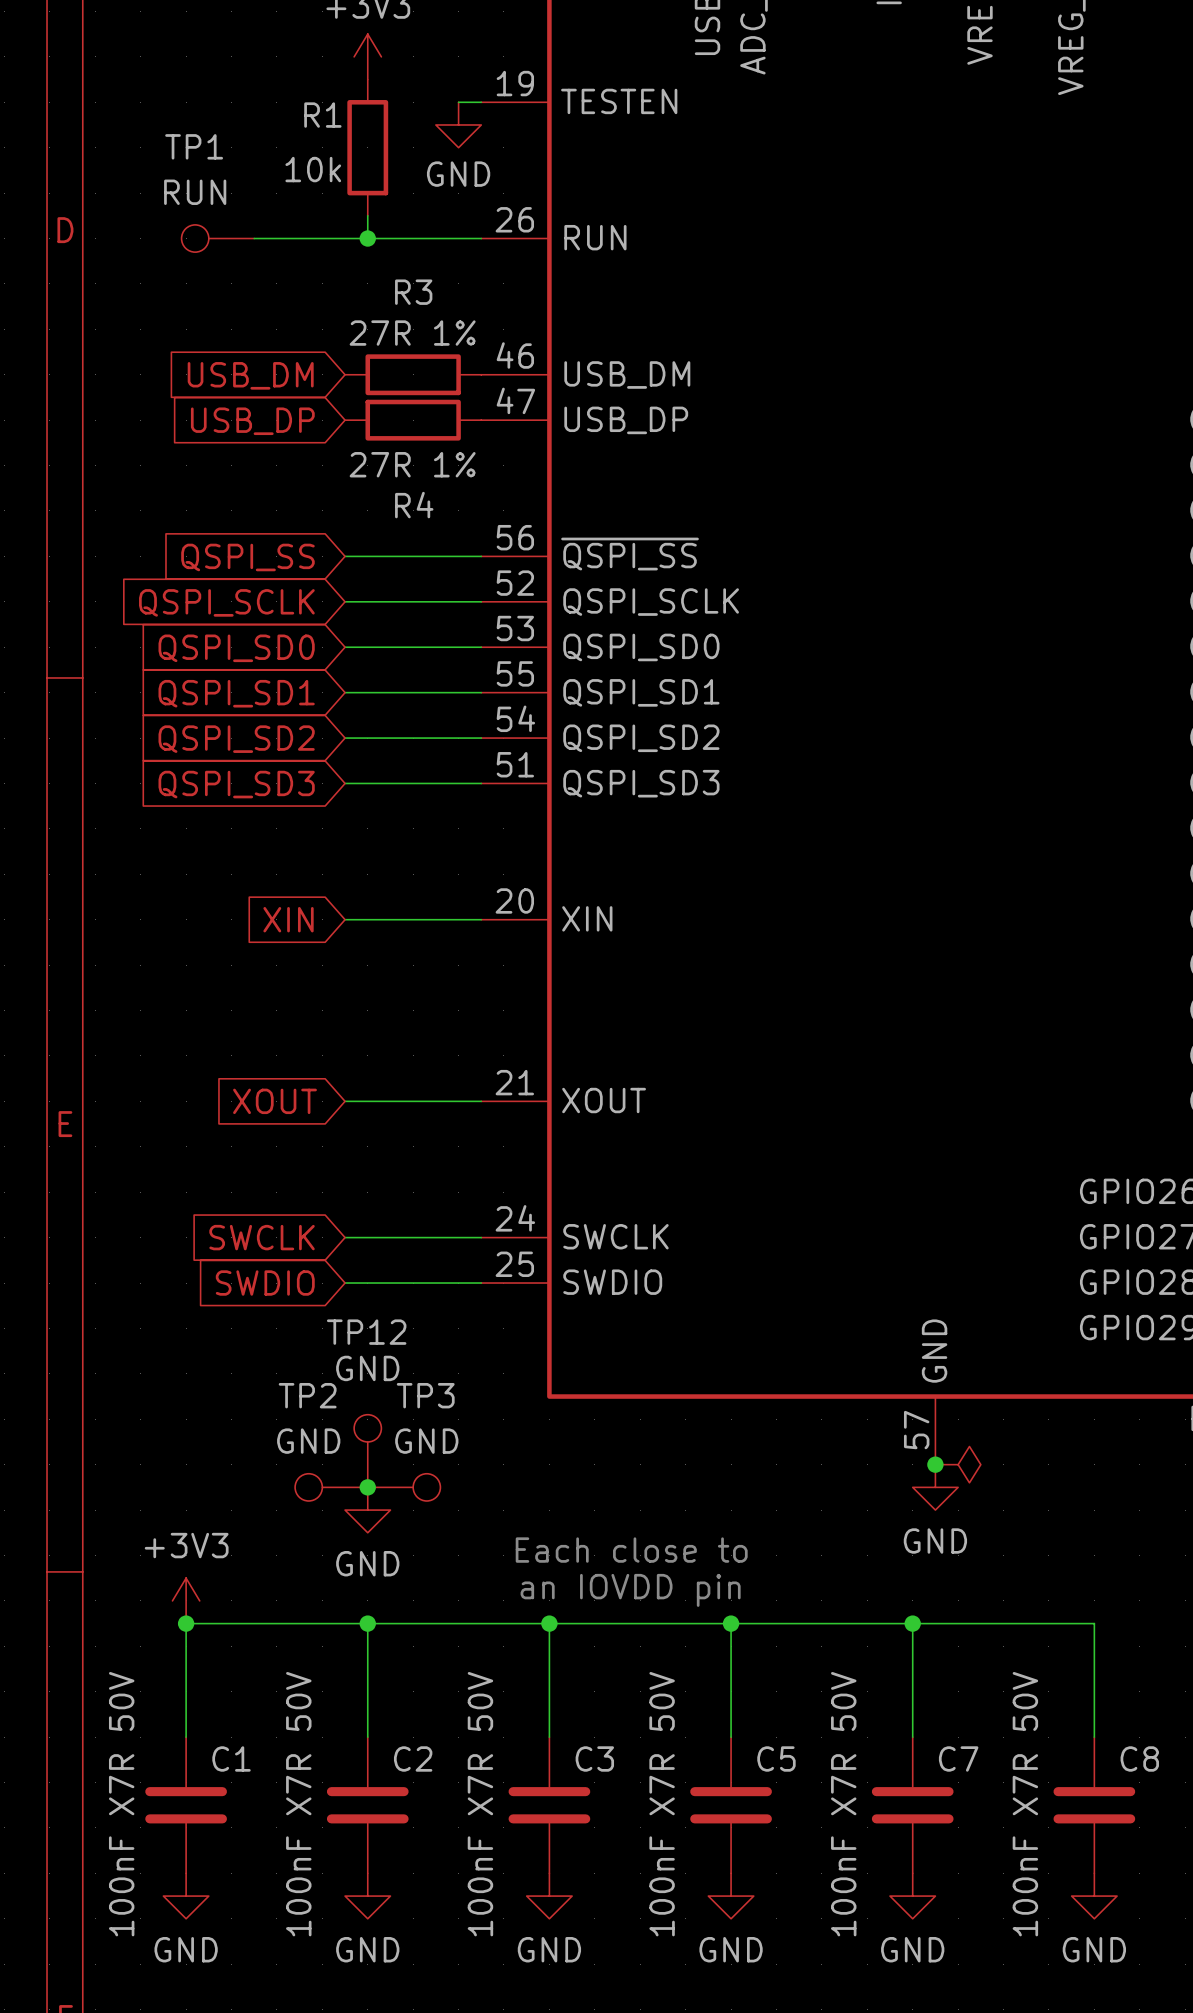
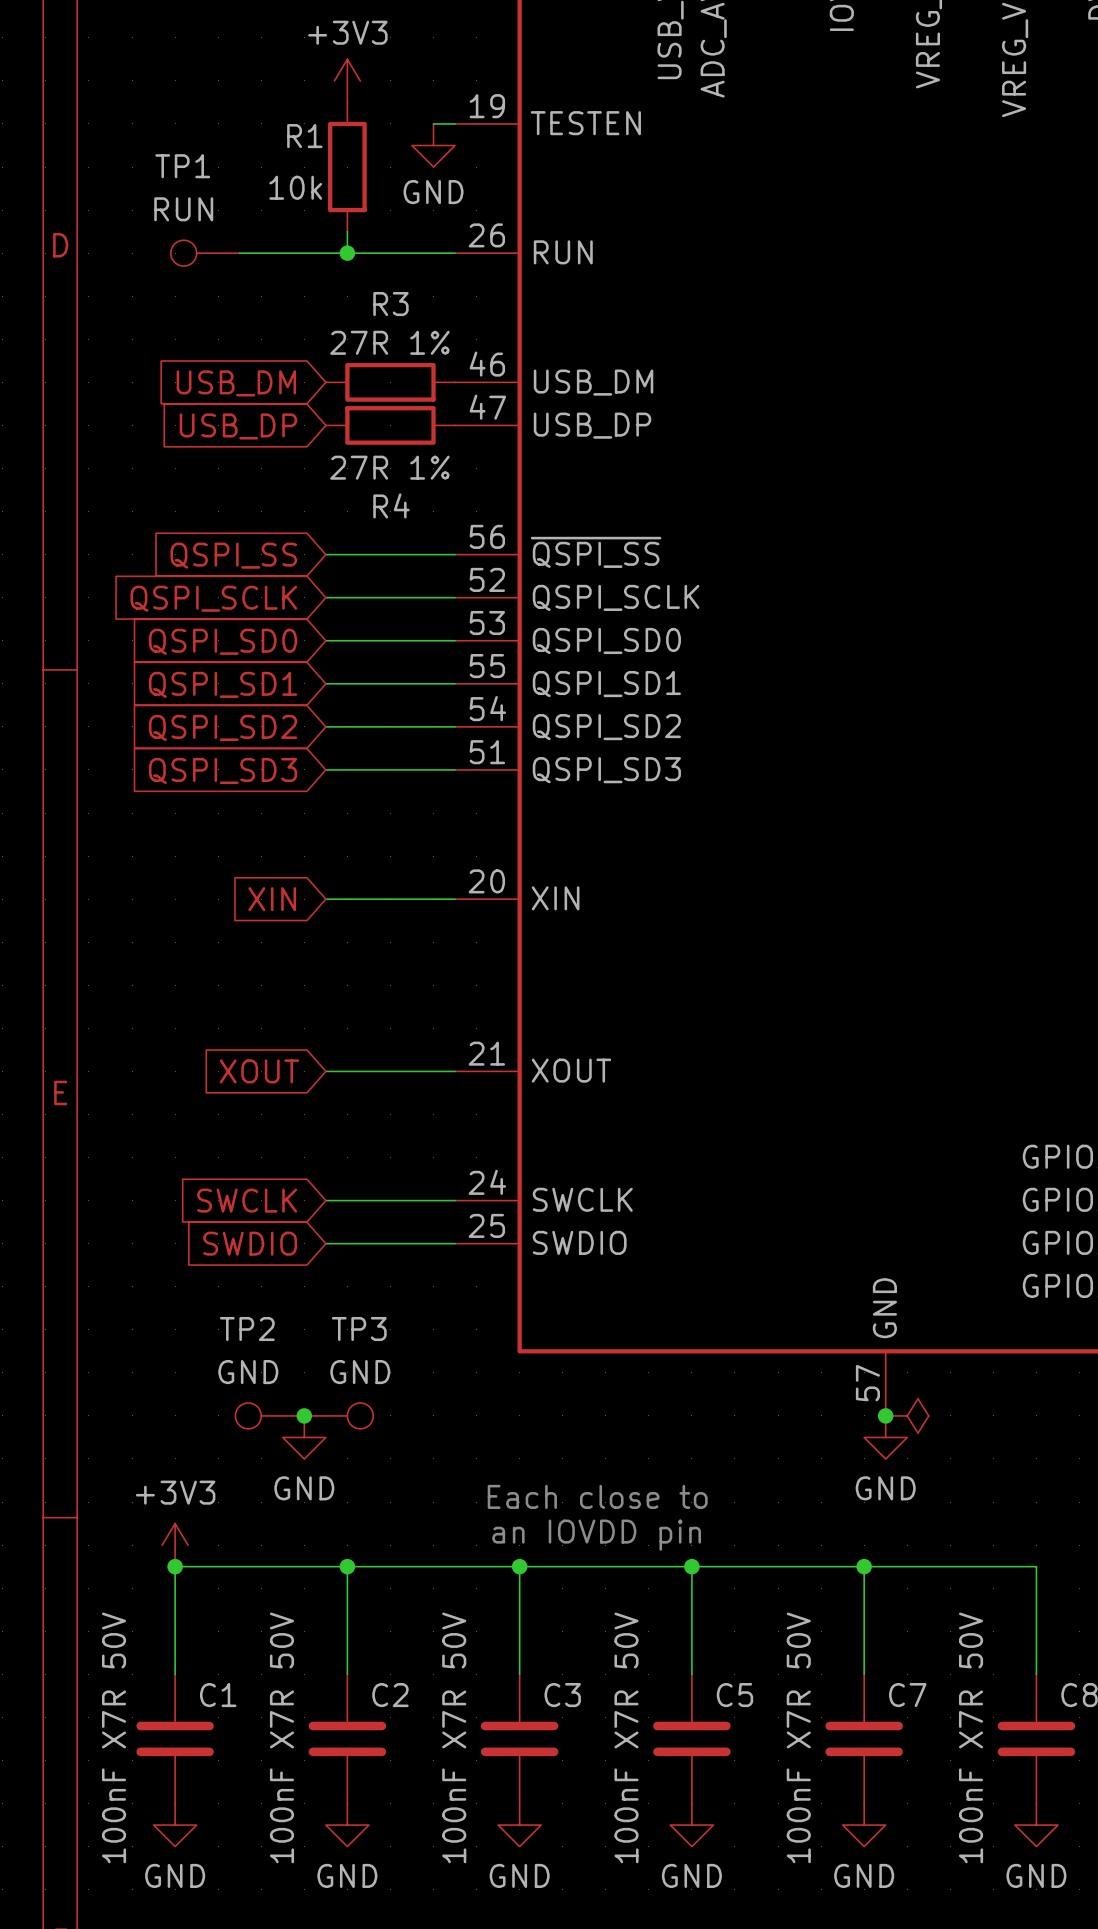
TP12: GND (367, 1451) -> none
TP2 position: (331, 1487) -> (269, 1415)
junction position: (367, 1487) -> (304, 1415)
TP3 position: (404, 1487) -> (338, 1415)
power symbol position: GND (367, 1510) -> GND (304, 1437)

